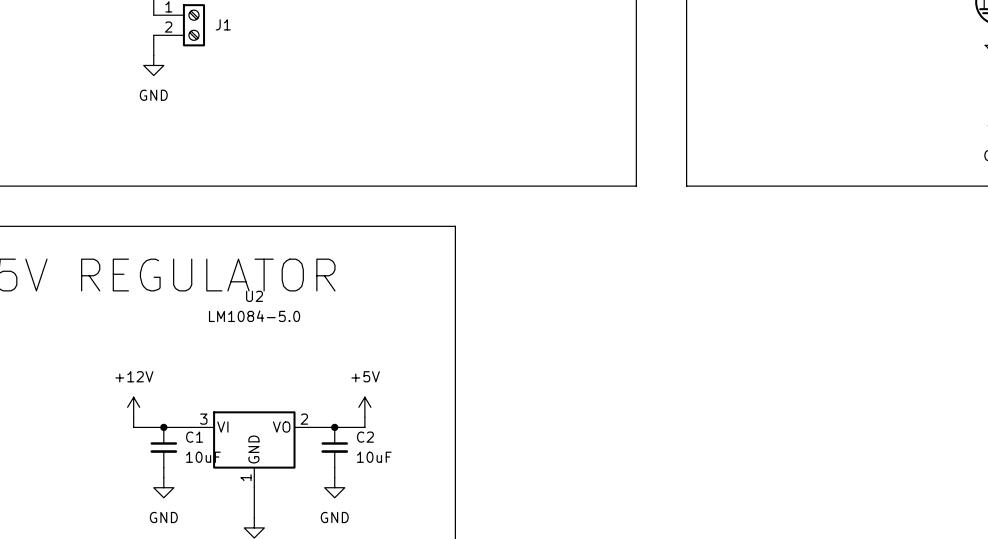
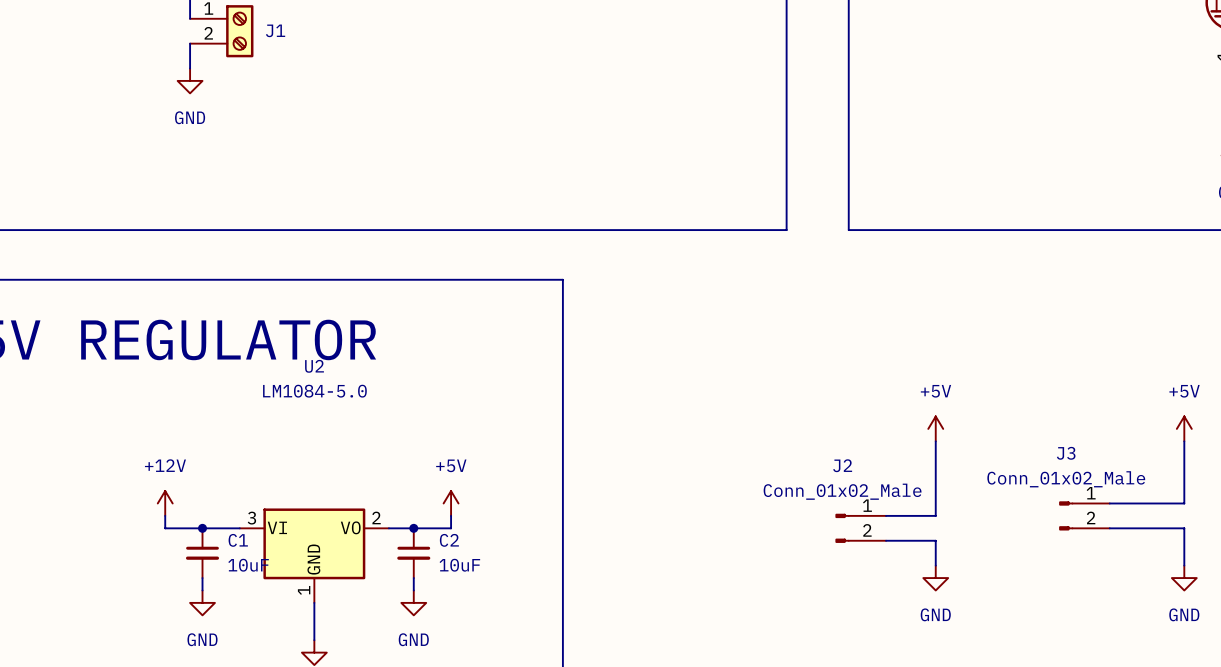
power symbol: none -> +5V (935, 428)
power symbol: none -> +5V (1184, 428)
wire: none -> (935, 441) (935, 515) (886, 515)
wire: none -> (1184, 441) (1184, 503) (1109, 503)
J3: none -> Conn_01x02_Male (1084, 515)
J2: none -> Conn_01x02_Male (860, 528)
wire: none -> (1109, 528) (1184, 528) (1184, 565)
wire: none -> (886, 540) (935, 540) (935, 565)
power symbol: none -> GND (935, 578)
power symbol: none -> GND (1184, 578)

